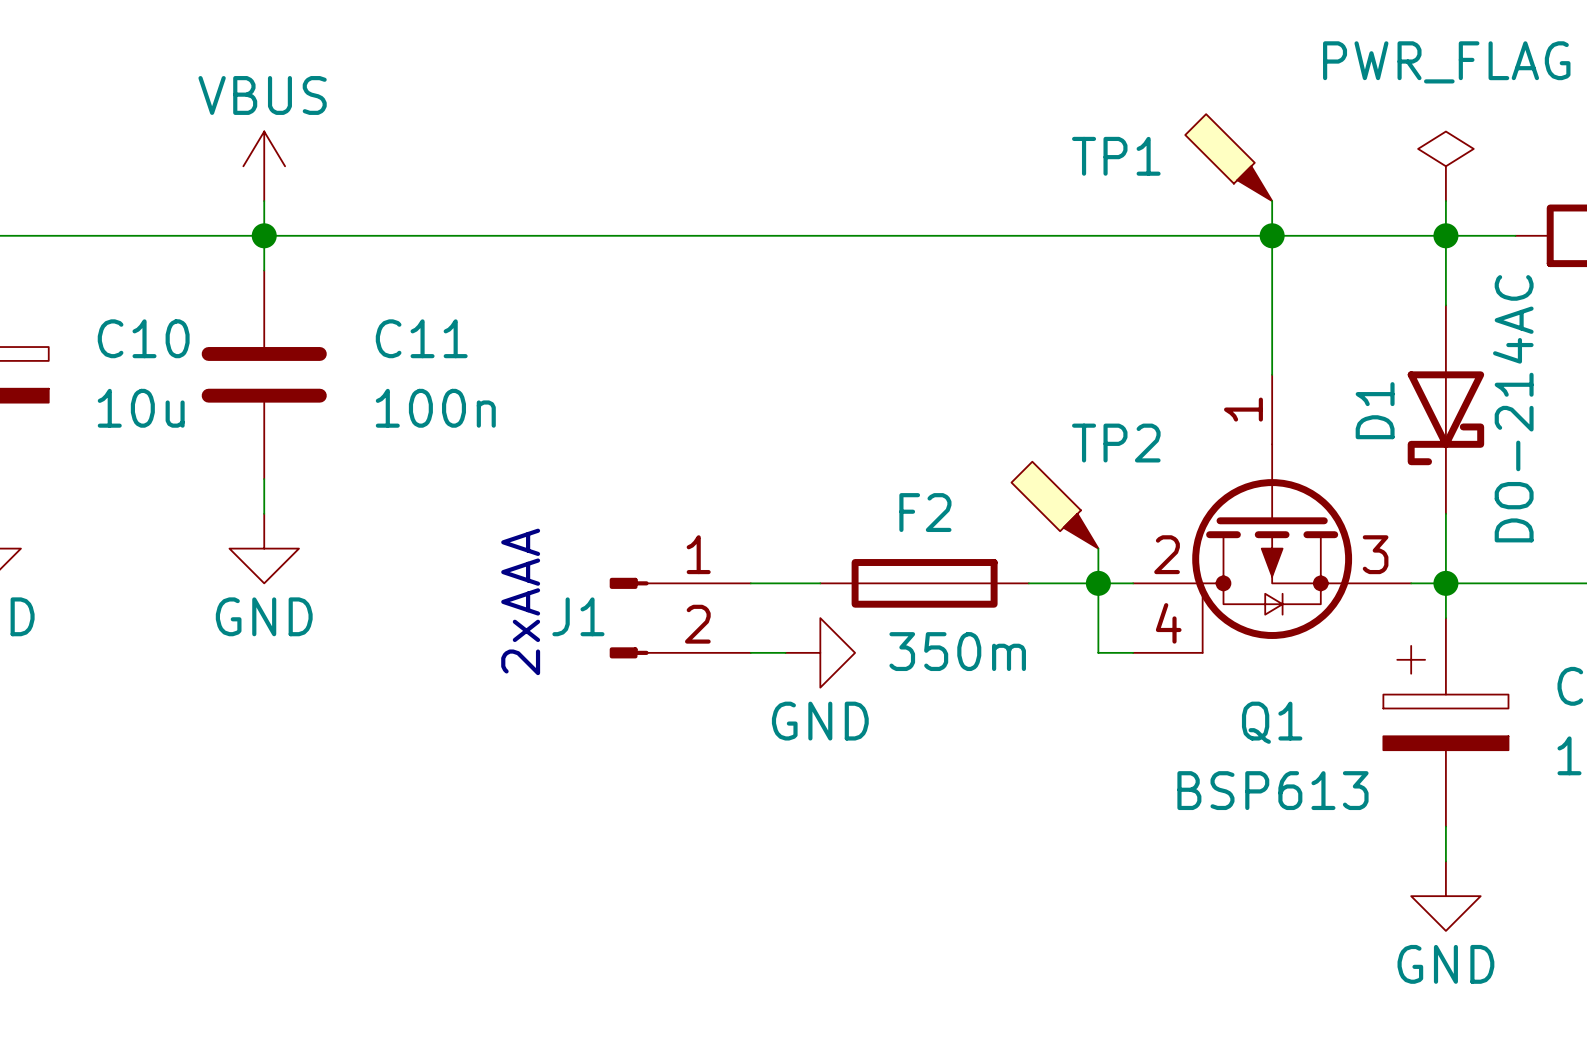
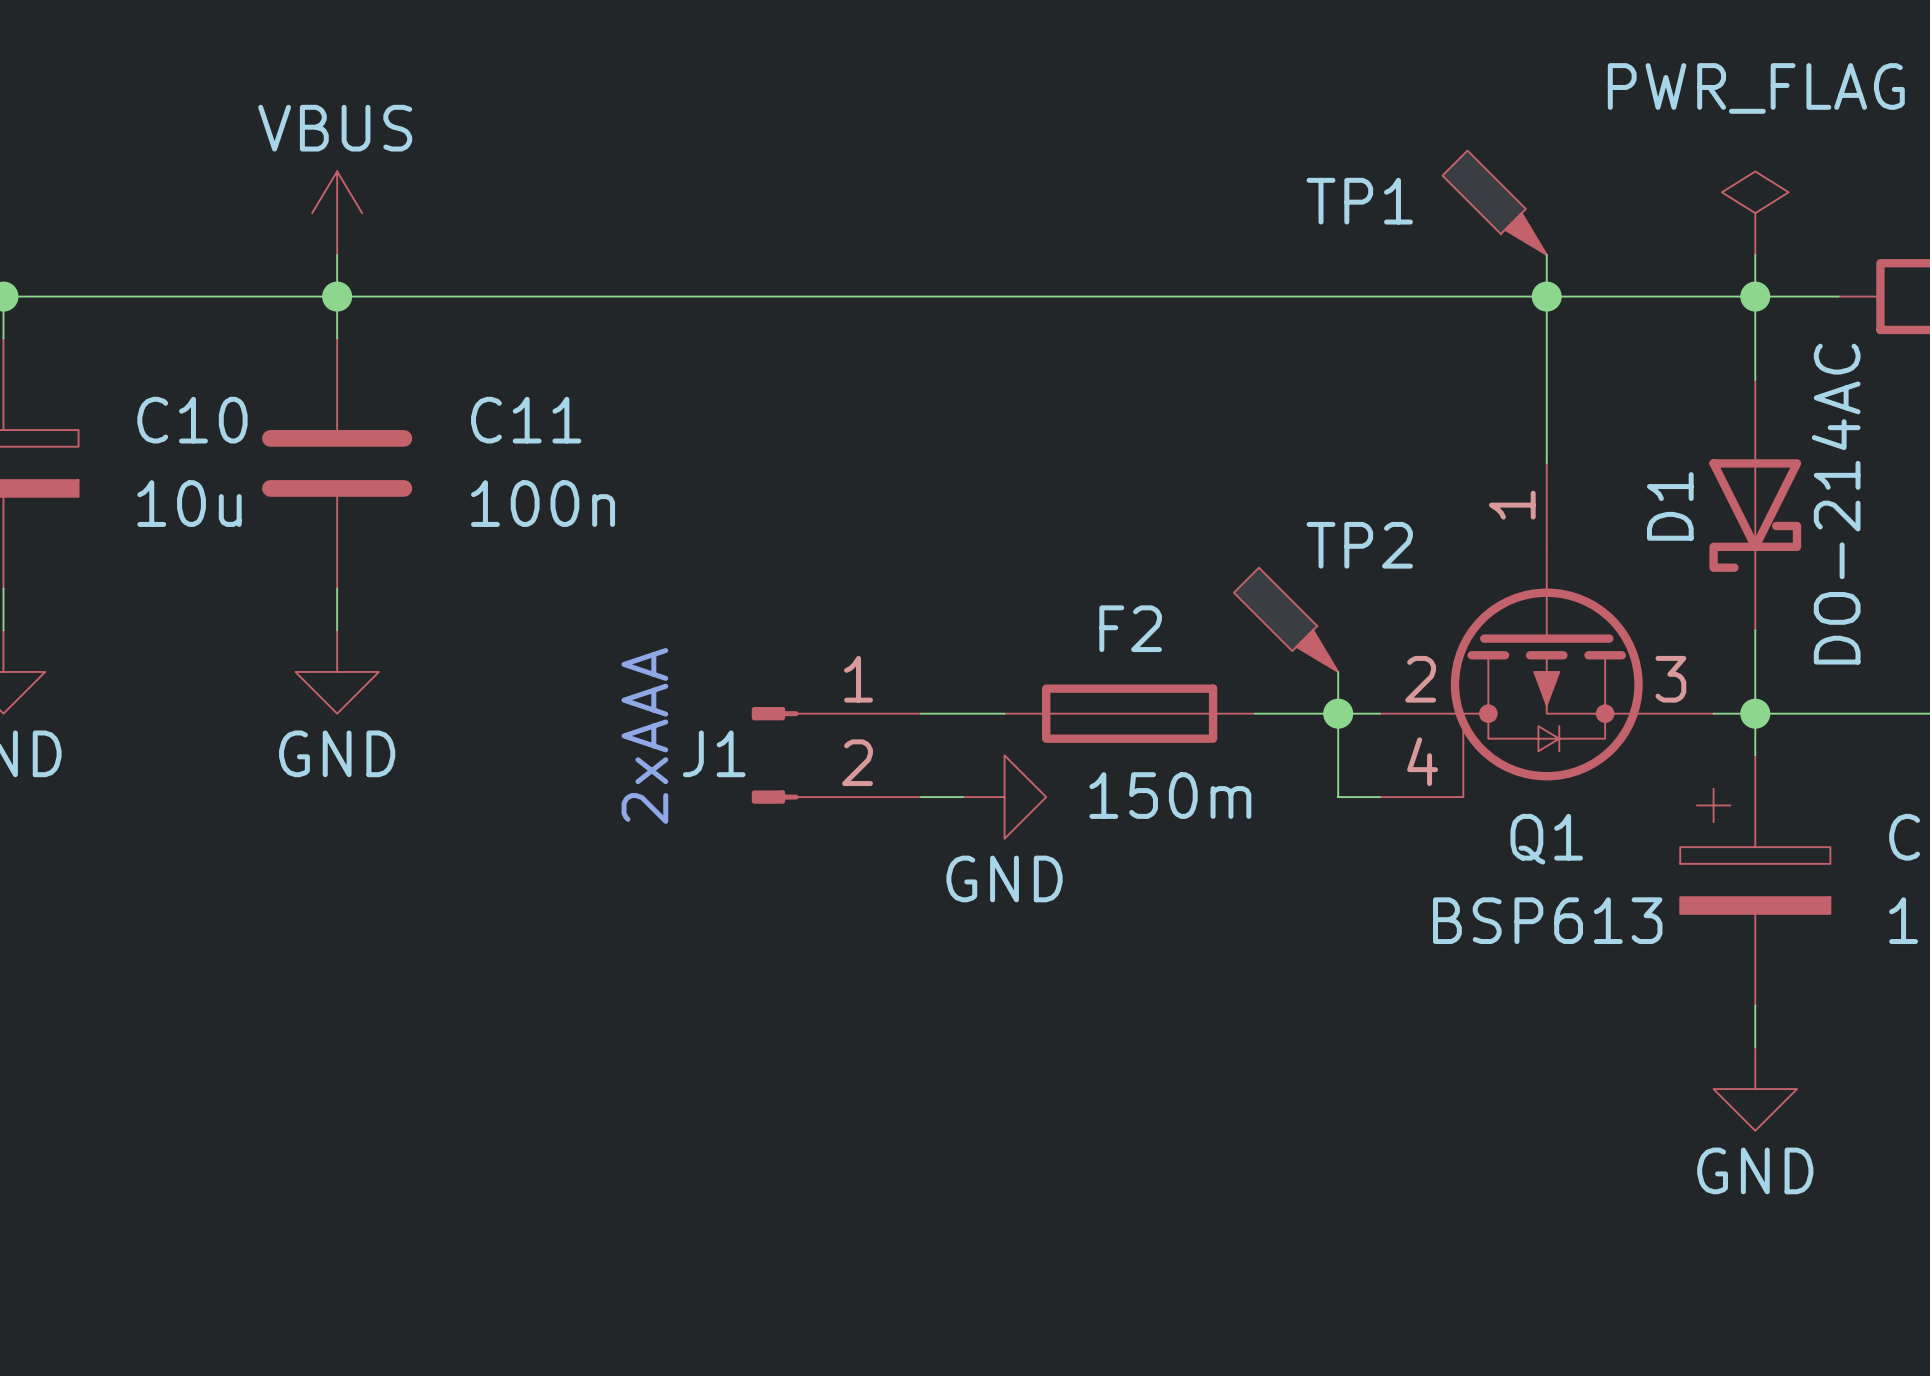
F2 value: 350m (957, 651) -> 150m (1170, 795)
Q1 name position: Q1 (1272, 722) -> Q1 (1546, 839)
Q1 value position: BSP613 (1272, 790) -> BSP613 (1547, 920)

